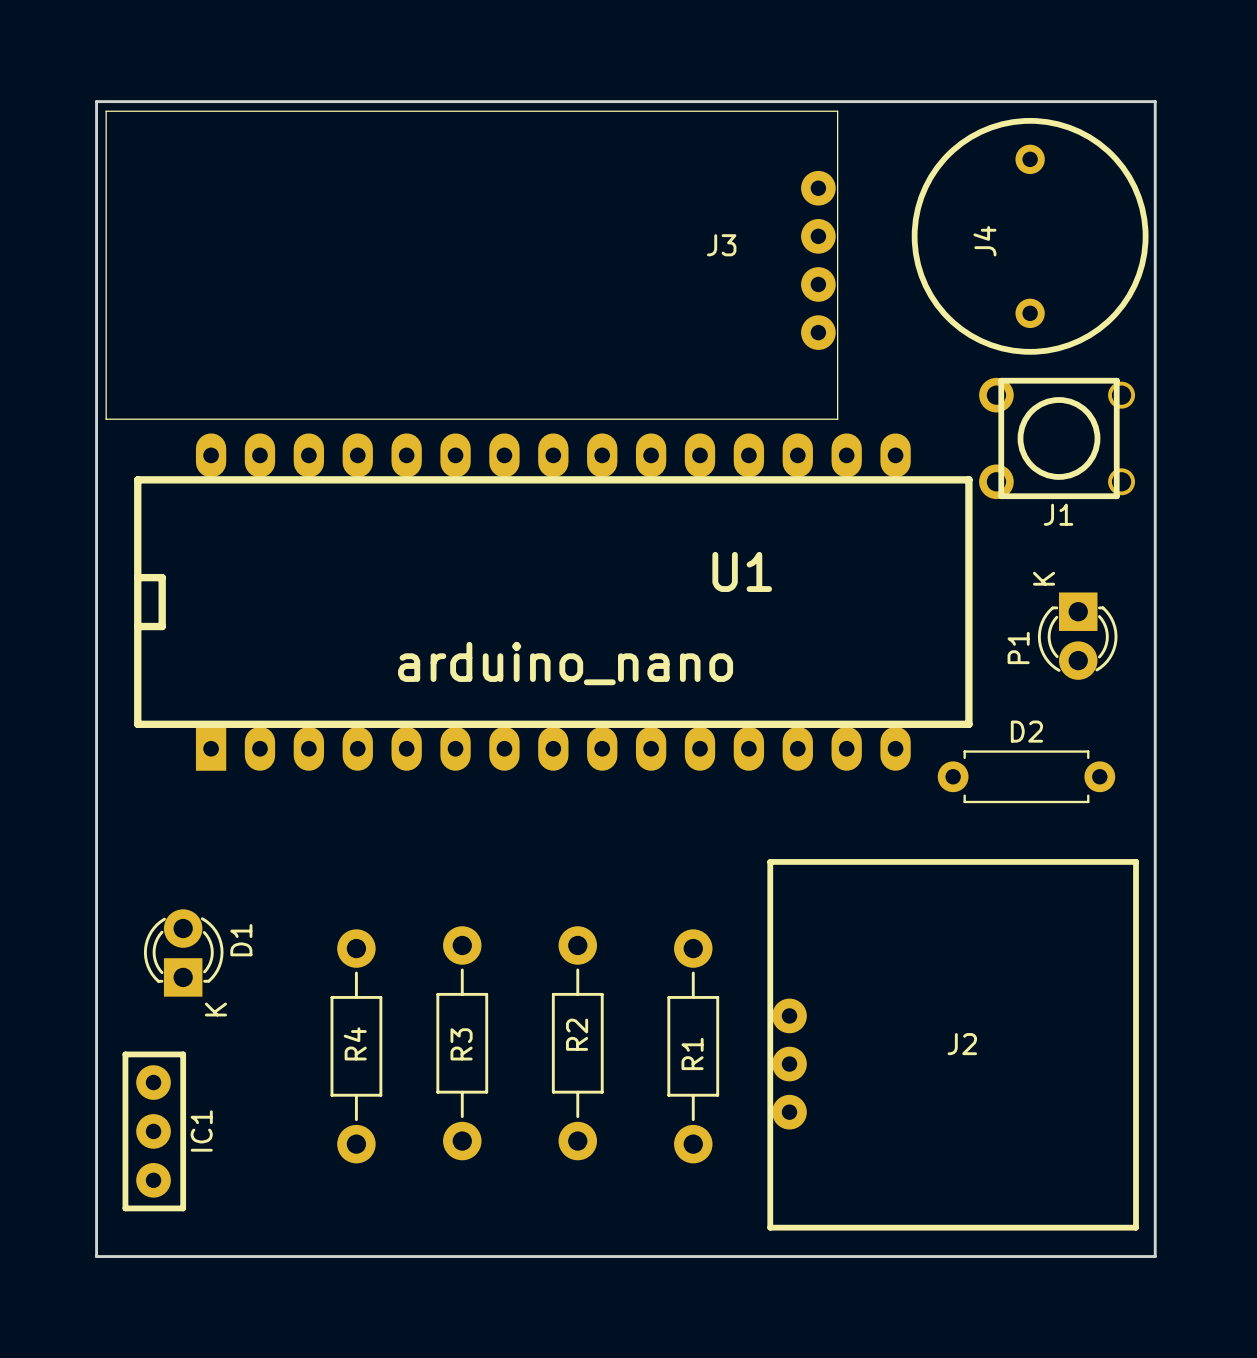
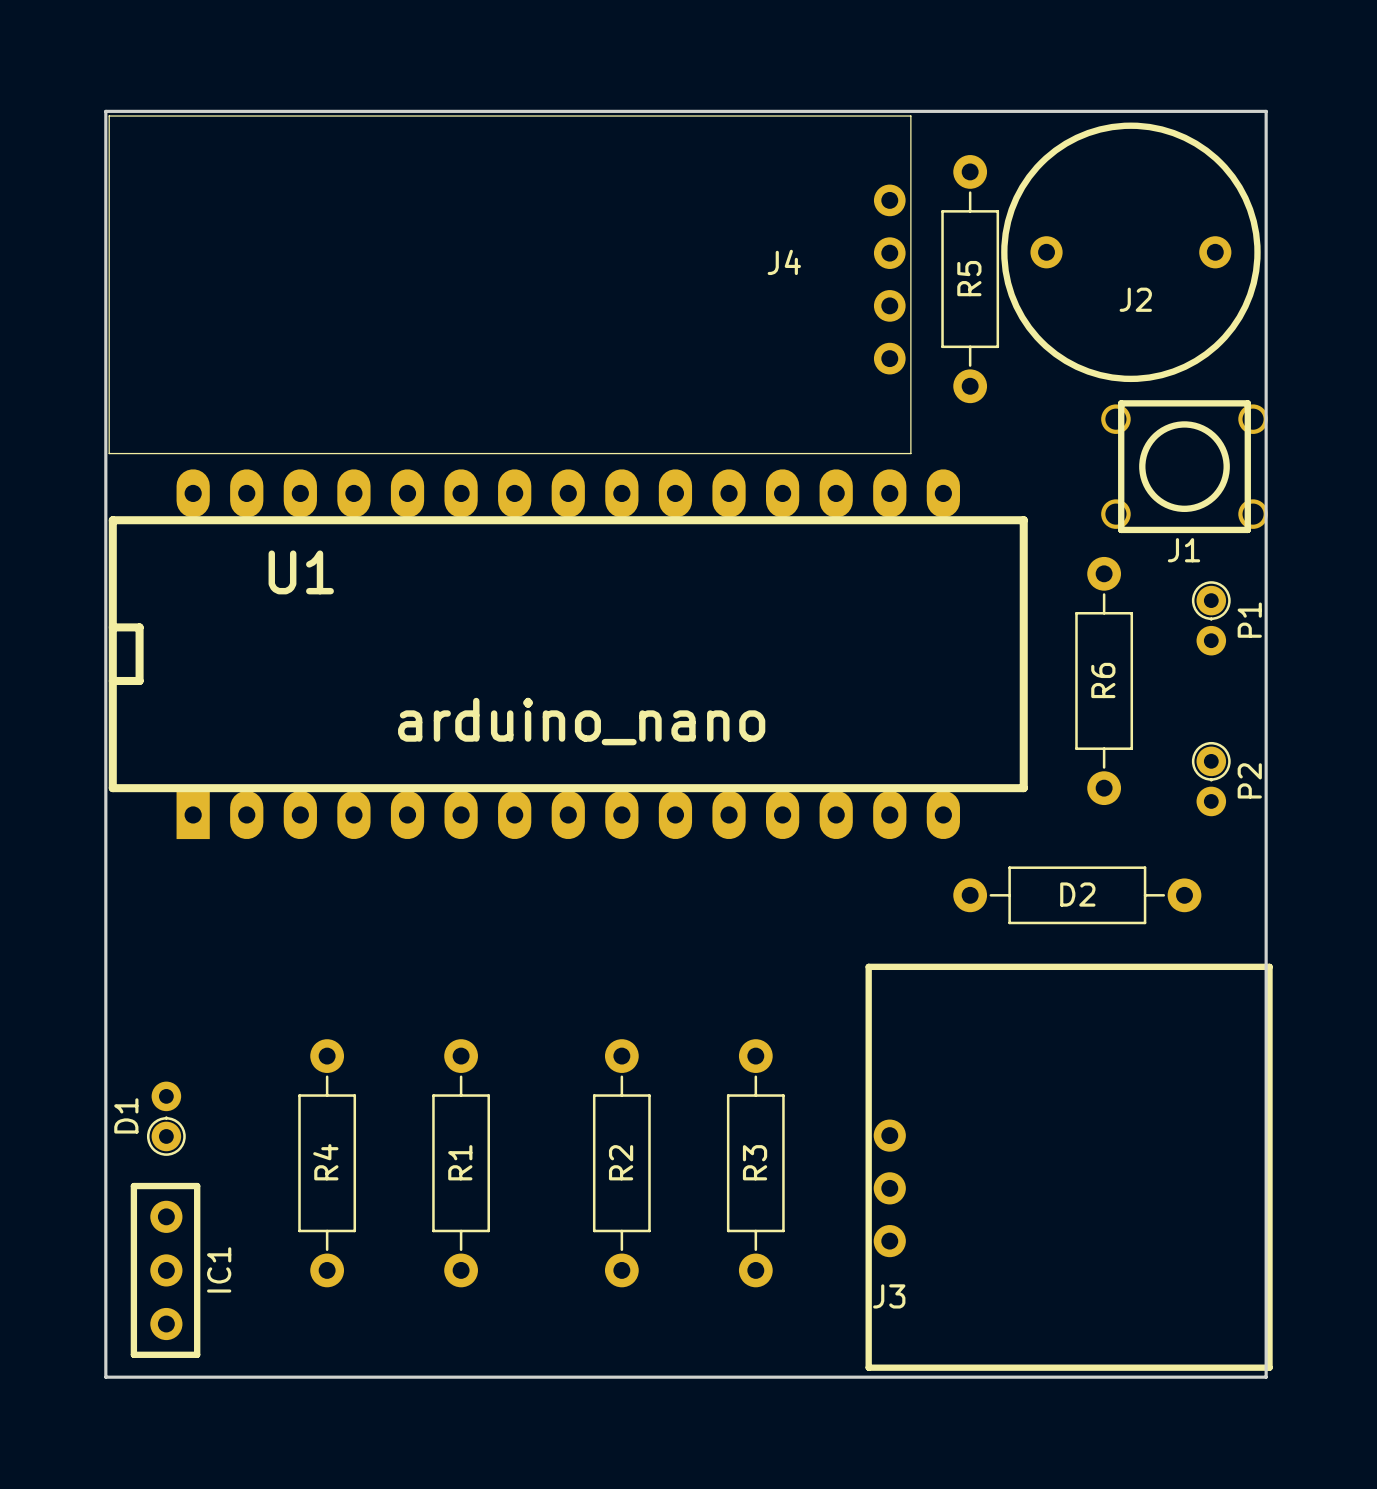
J3 footprint: [106, 111, 838, 420] -> [865, 963, 1273, 1371]
J4 footprint: [911, 117, 1149, 355] -> [109, 116, 911, 454]
J4 name position: J4 (984, 241) -> J4 (784, 262)
J3 name position: J3 (721, 245) -> J3 (889, 1296)
R5: none -> (970, 279)
J1 footprint: [979, 377, 1136, 500] -> [1101, 400, 1268, 534]
U1 name position: U1 (742, 571) -> U1 (301, 572)
P1 footprint: [1037, 592, 1118, 680] -> [1191, 581, 1231, 656]
U1 position: (553, 602) -> (568, 654)
R6: none -> (1104, 680)
P1 name position: P1 (1018, 648) -> P1 (1249, 620)
P2: none -> (1211, 779)
D2 name position: D2 (1026, 731) -> D2 (1077, 894)
D2 footprint: [937, 750, 1116, 804] -> [953, 866, 1202, 925]
J2 footprint: [767, 859, 1139, 1231] -> [1001, 122, 1261, 383]
D1 footprint: [143, 909, 224, 997] -> [146, 1081, 186, 1156]
R3 footprint: [436, 926, 489, 1161] -> [726, 1039, 785, 1288]
R2 footprint: [551, 926, 604, 1161] -> [592, 1039, 651, 1288]
R4 footprint: [330, 929, 383, 1164] -> [298, 1039, 357, 1288]
R1 footprint: [667, 929, 720, 1164] -> [432, 1039, 491, 1288]
D1 name position: D1 (241, 940) -> D1 (126, 1115)
J2 name position: J2 (962, 1044) -> J2 (1135, 299)
IC1 footprint: [122, 1051, 187, 1212] -> [130, 1182, 201, 1358]

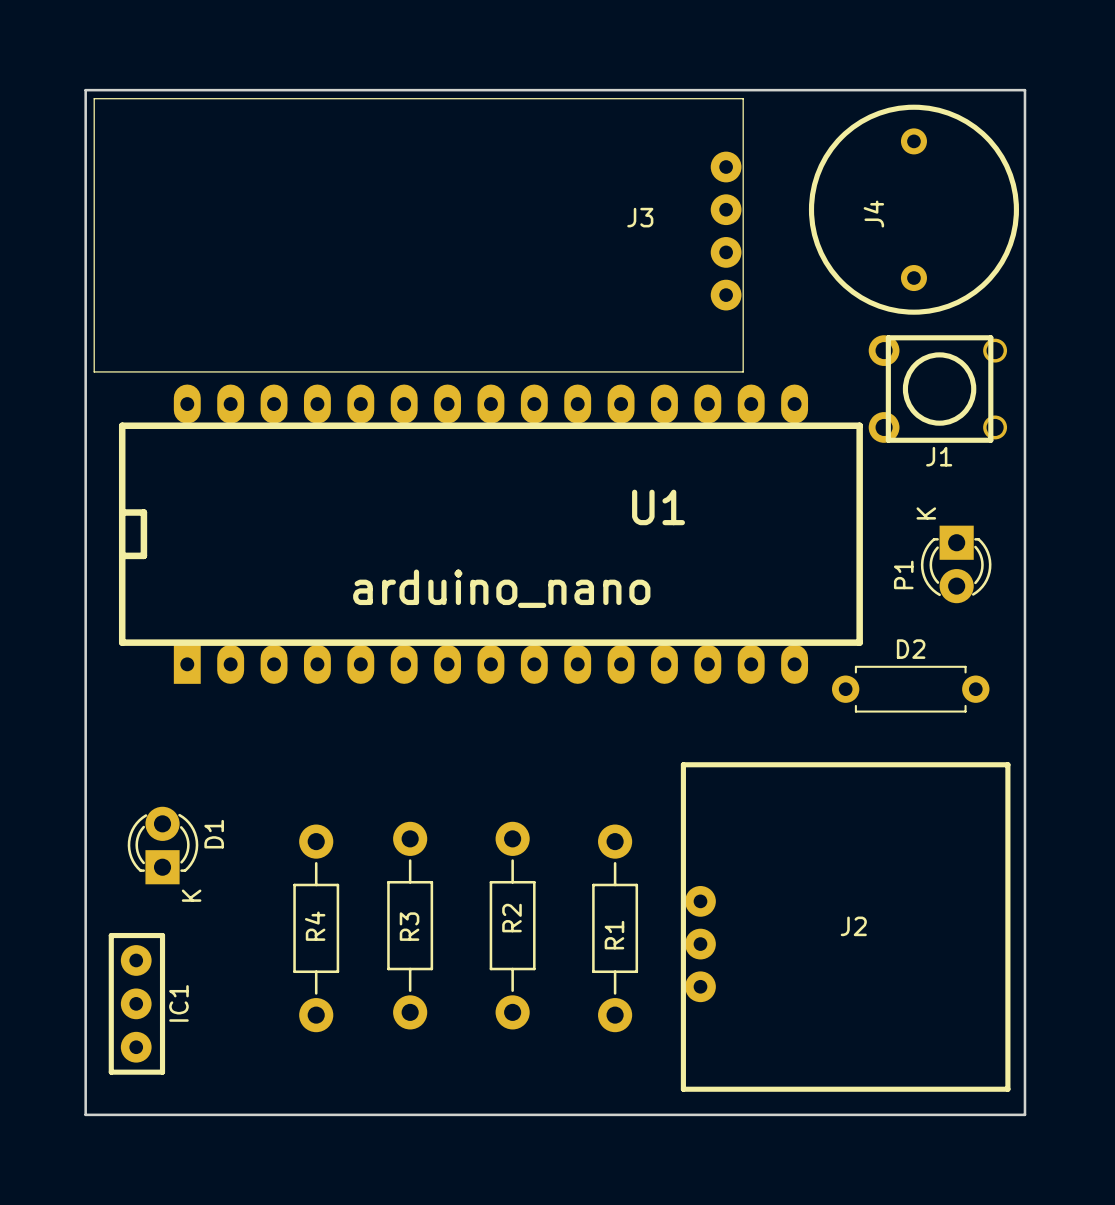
J4 footprint: [109, 116, 911, 454] -> [808, 104, 1020, 315]
J2 footprint: [1001, 122, 1261, 383] -> [680, 762, 1011, 1092]
J4 name position: J4 (784, 262) -> J4 (873, 214)
R5: (970, 279) -> none
J2 name position: J2 (1135, 299) -> J2 (853, 926)
J1 footprint: [1101, 400, 1268, 534] -> [868, 335, 1008, 443]
U1 name position: U1 (301, 572) -> U1 (658, 507)
P1 footprint: [1191, 581, 1231, 656] -> [920, 525, 992, 604]
P1 name position: P1 (1249, 620) -> P1 (903, 574)
U1 position: (568, 654) -> (490, 534)
R6: (1104, 680) -> none
P2: (1211, 779) -> none
D2 footprint: [953, 866, 1202, 925] -> [831, 665, 990, 713]
D2 name position: D2 (1077, 894) -> D2 (911, 649)
J3 footprint: [865, 963, 1273, 1371] -> [94, 98, 744, 372]
R4 footprint: [298, 1039, 357, 1288] -> [293, 824, 340, 1033]
R1 footprint: [432, 1039, 491, 1288] -> [592, 824, 639, 1033]
R2 footprint: [592, 1039, 651, 1288] -> [489, 821, 536, 1030]
R3 footprint: [726, 1039, 785, 1288] -> [387, 821, 434, 1030]
D1 footprint: [146, 1081, 186, 1156] -> [127, 806, 199, 885]
D1 name position: D1 (126, 1115) -> D1 (214, 834)
IC1 footprint: [130, 1182, 201, 1358] -> [108, 932, 166, 1075]
J3 name position: J3 (889, 1296) -> J3 (640, 217)

